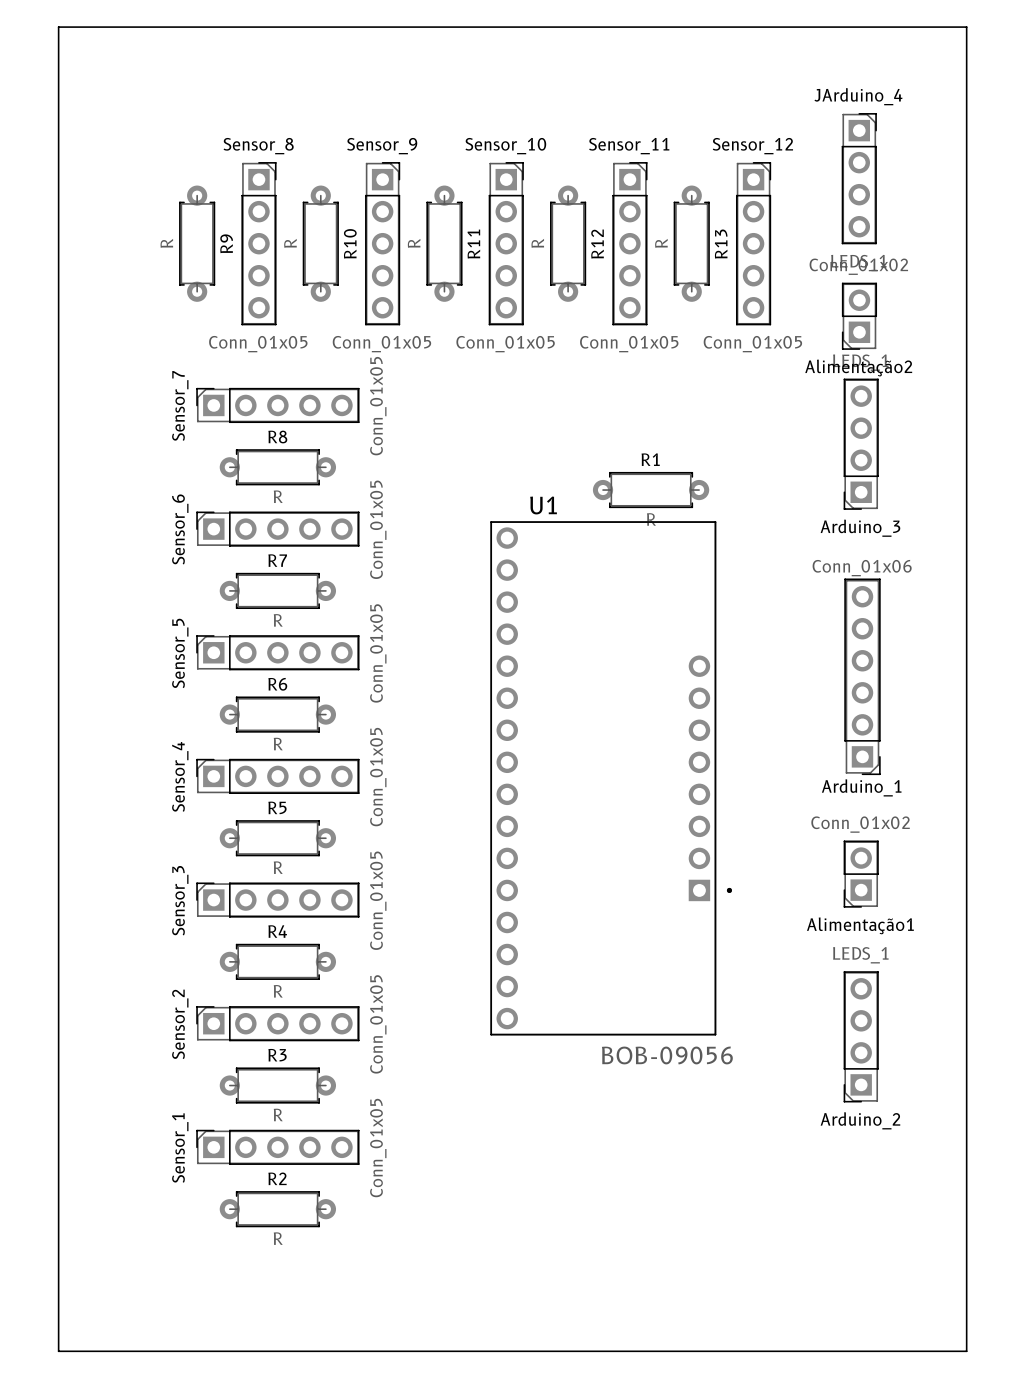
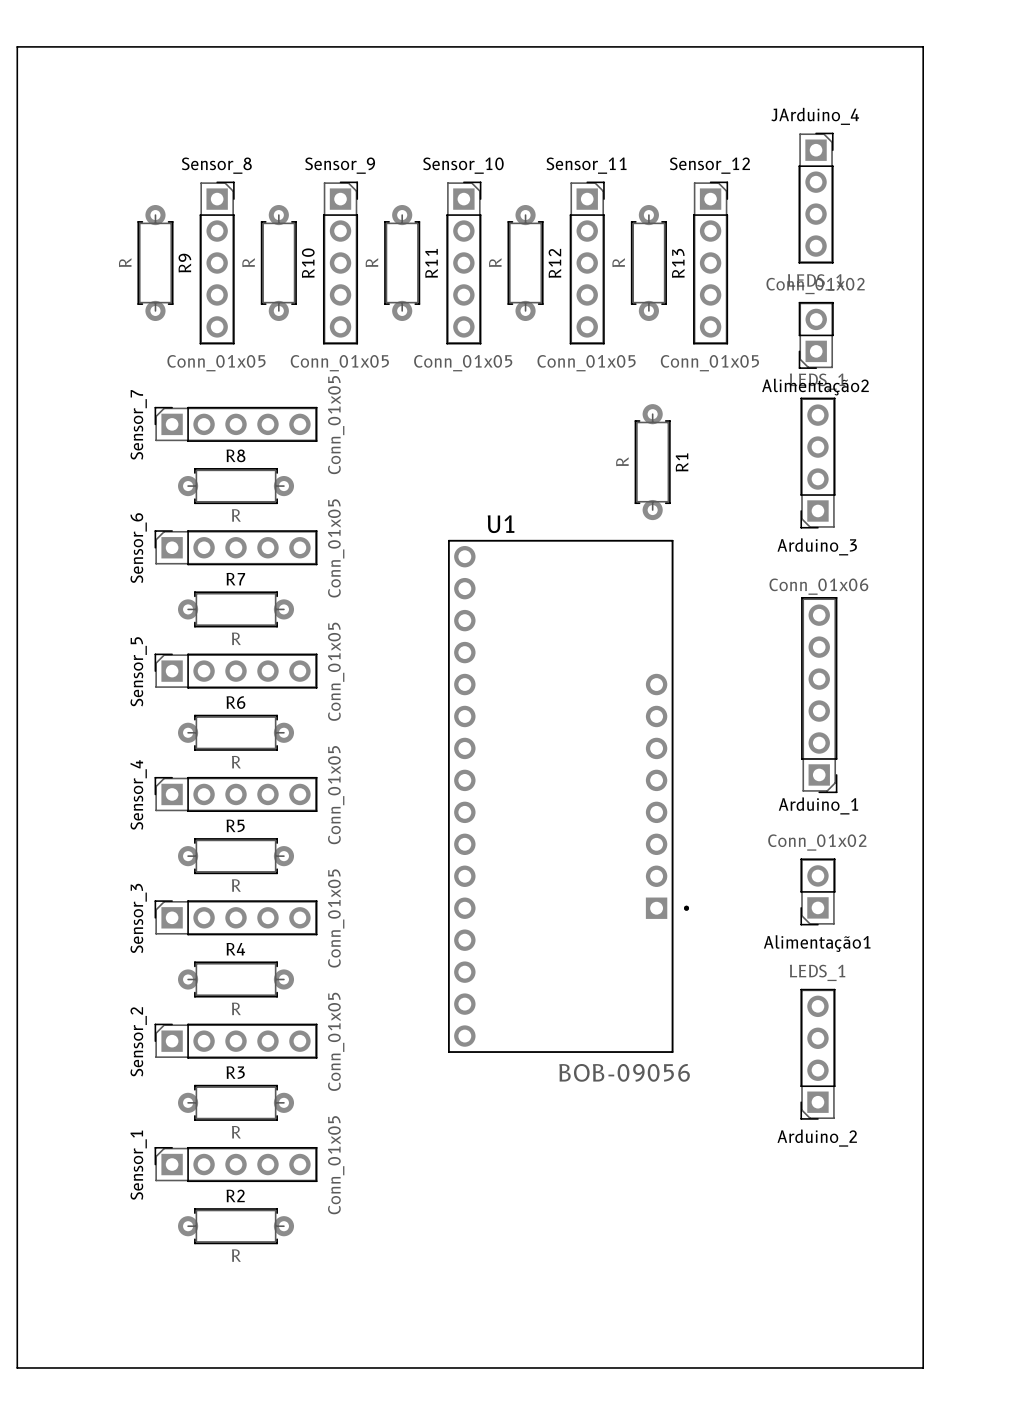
R1 rotation: 0° (651, 490) -> 90° clockwise (652, 462)

